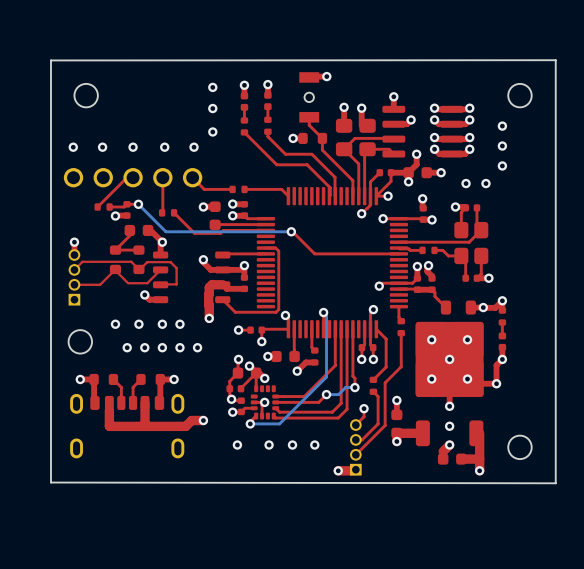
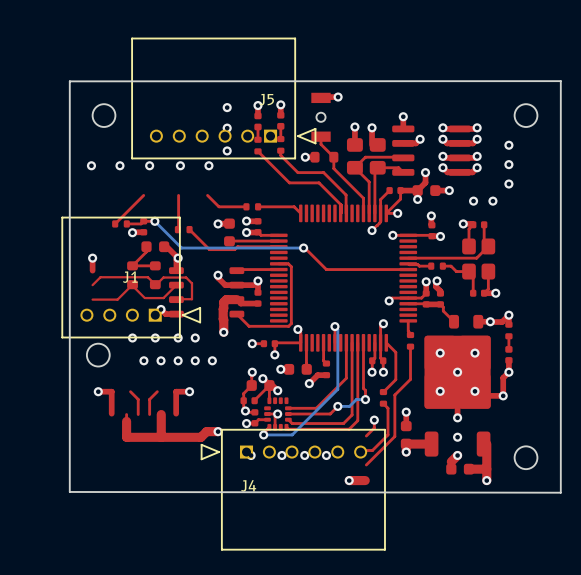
J5: none -> (223, 98)
part: (133, 177) -> none
J1: none -> (131, 277)
part: (74, 277) -> none
part: (103, 379) -> none
part: (150, 379) -> none
part: (127, 426) -> none
part: (355, 447) -> none
J4: none -> (293, 489)

